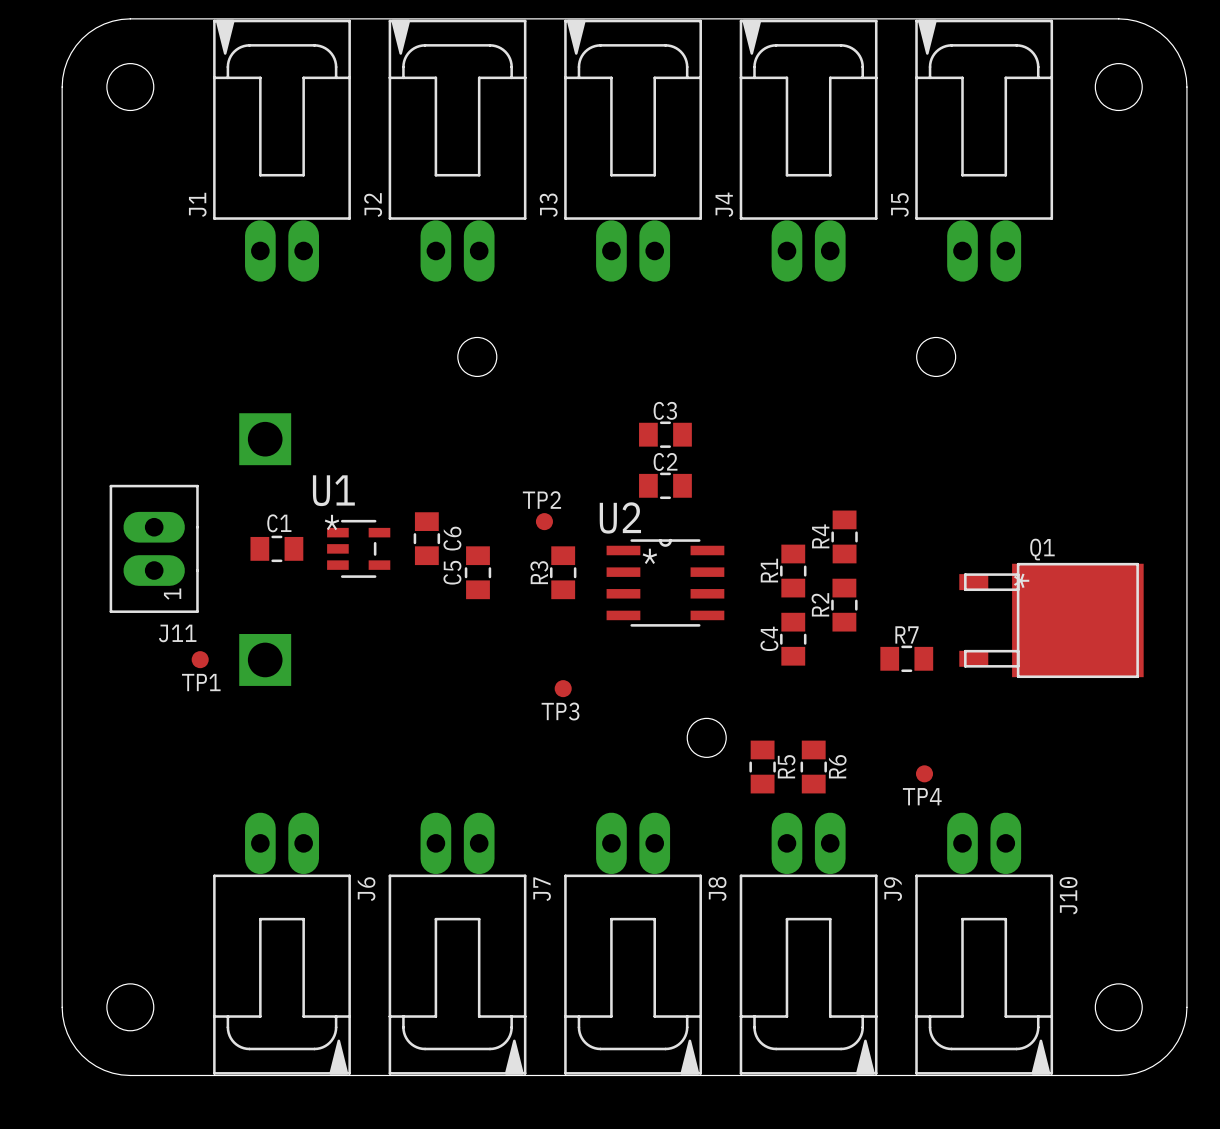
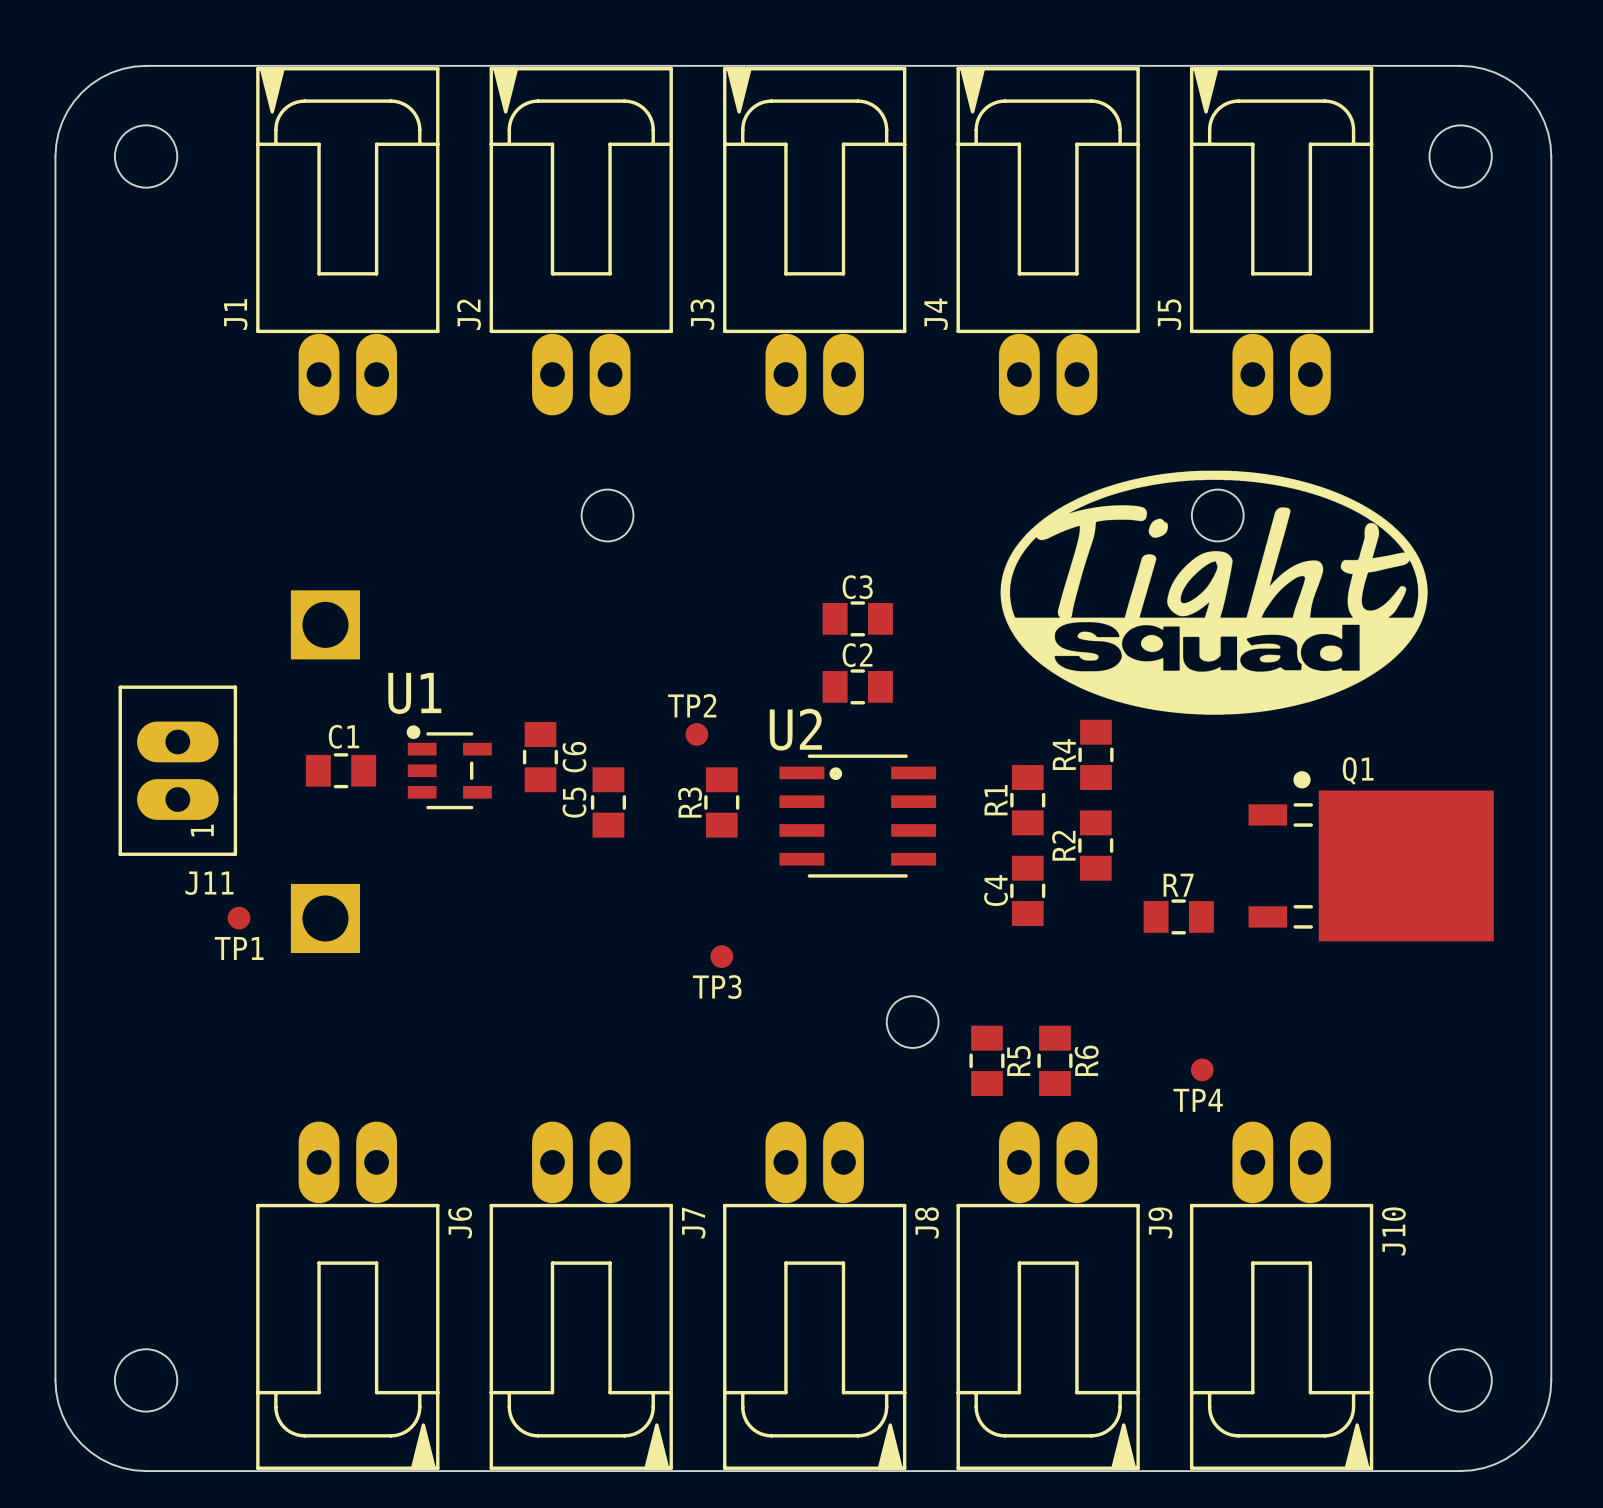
drawing: none -> [1000, 470, 1428, 715]
U1 footprint: [327, 519, 391, 578] -> [406, 725, 492, 810]
U2 footprint: [606, 538, 725, 627] -> [779, 754, 937, 878]
Q1 footprint: [959, 562, 1144, 679] -> [1248, 771, 1494, 942]

